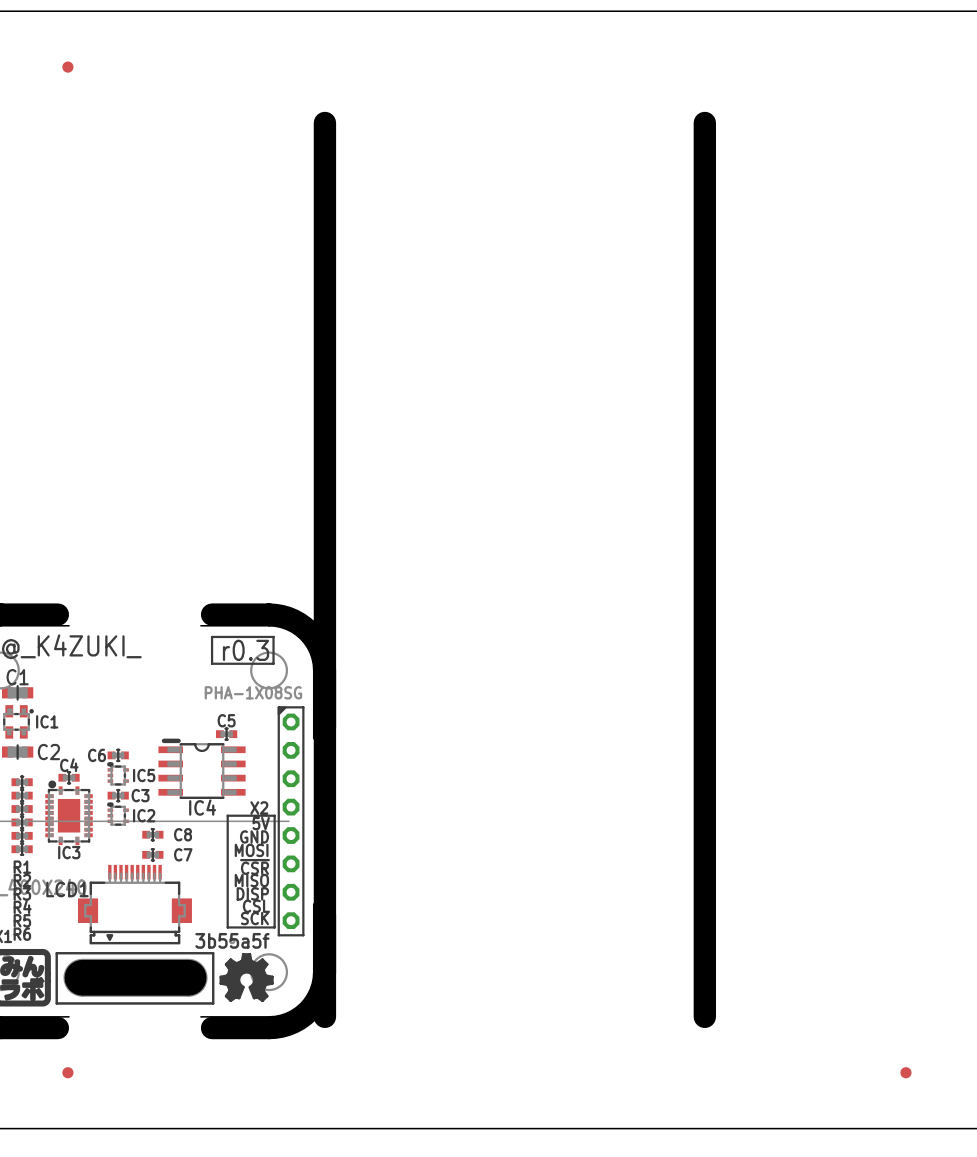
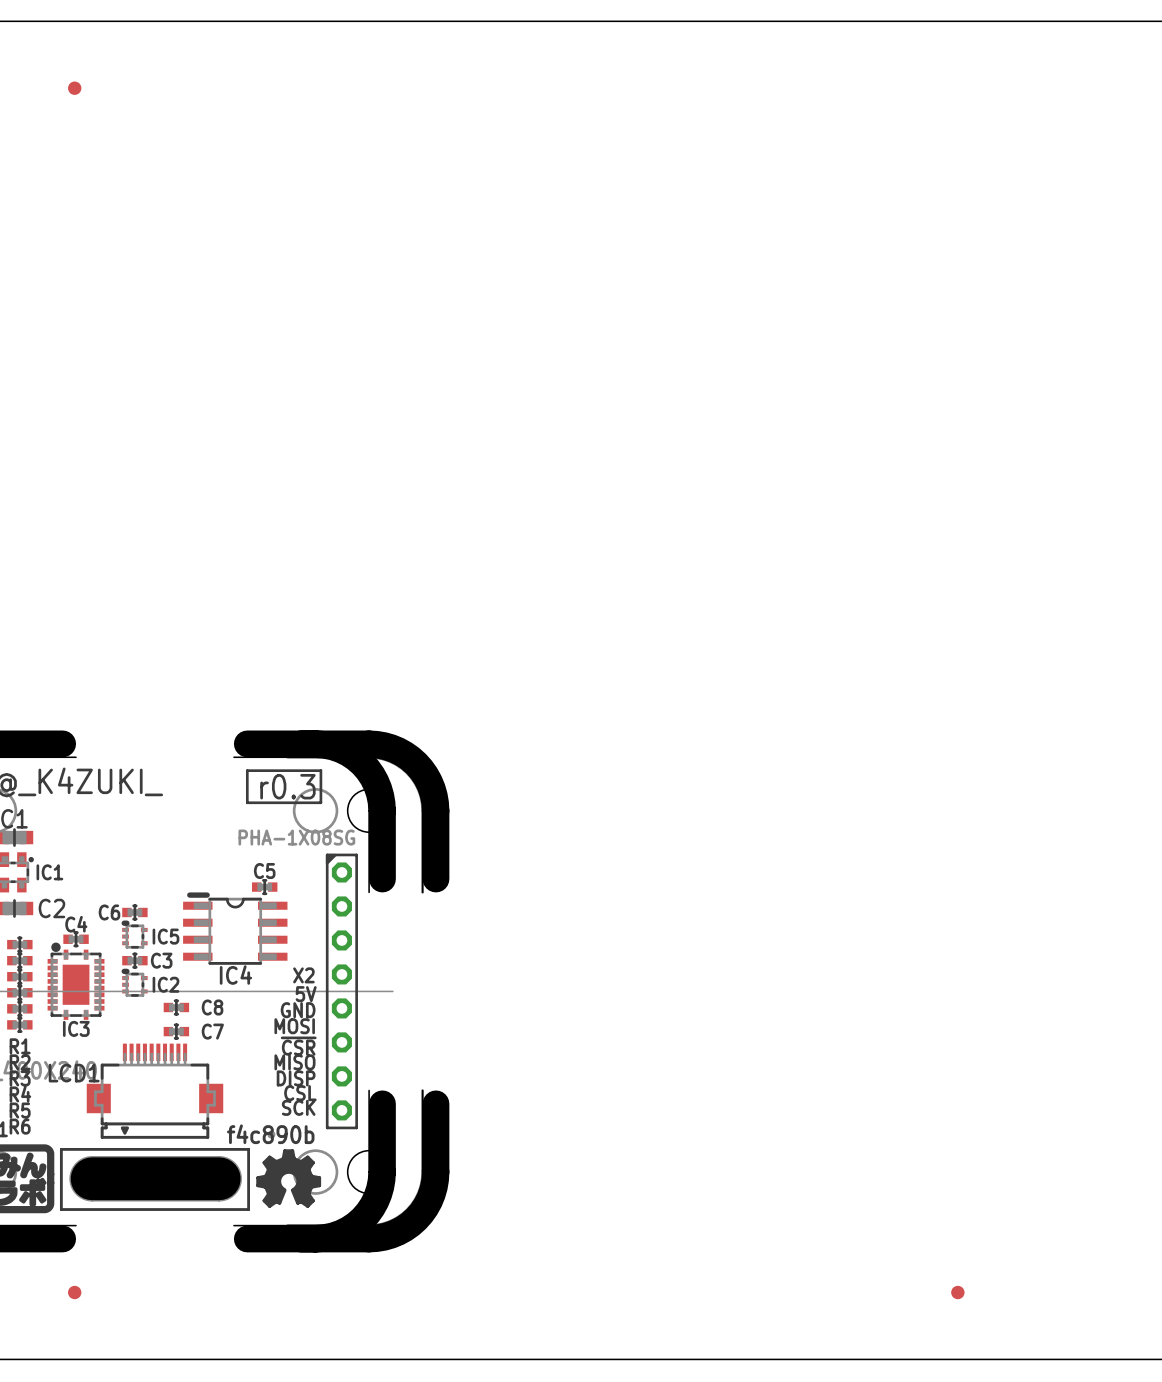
board edge: (324, 122) (324, 1016) -> none
board edge: (704, 122) (704, 1016) -> none
part: none -> (367, 812)
line: (227, 815) (274, 815) (274, 927) (227, 927) (227, 815) -> none
line: none -> (339, 991) (392, 991)
drawing shape: [195, 932, 270, 949] -> [226, 1124, 315, 1145]
part: none -> (367, 1170)
part position: (905, 1072) -> (957, 1292)

